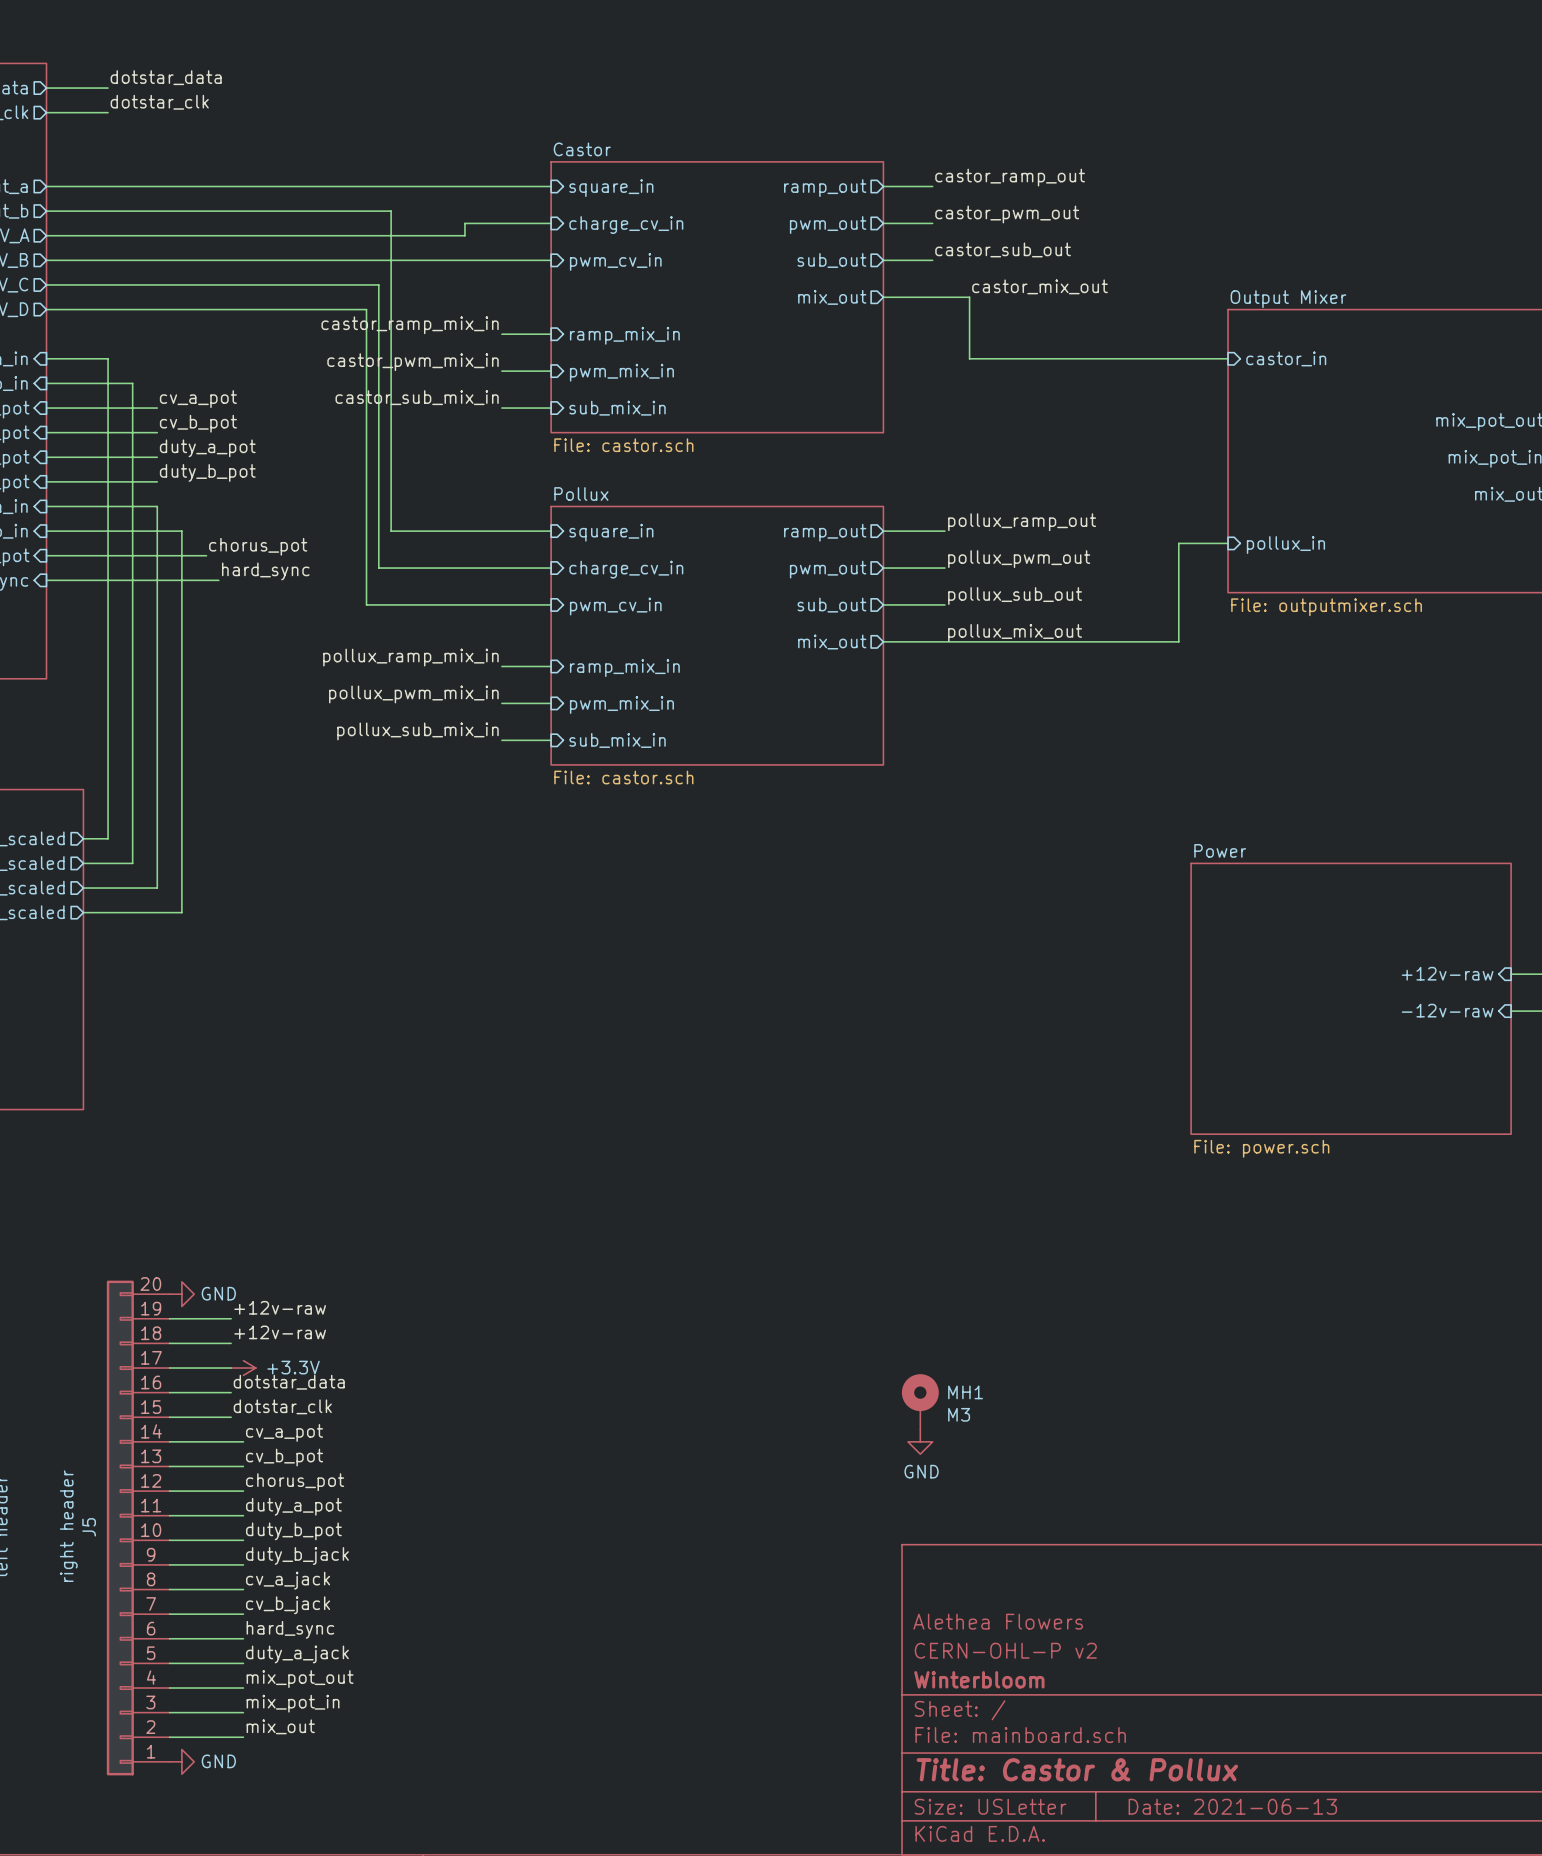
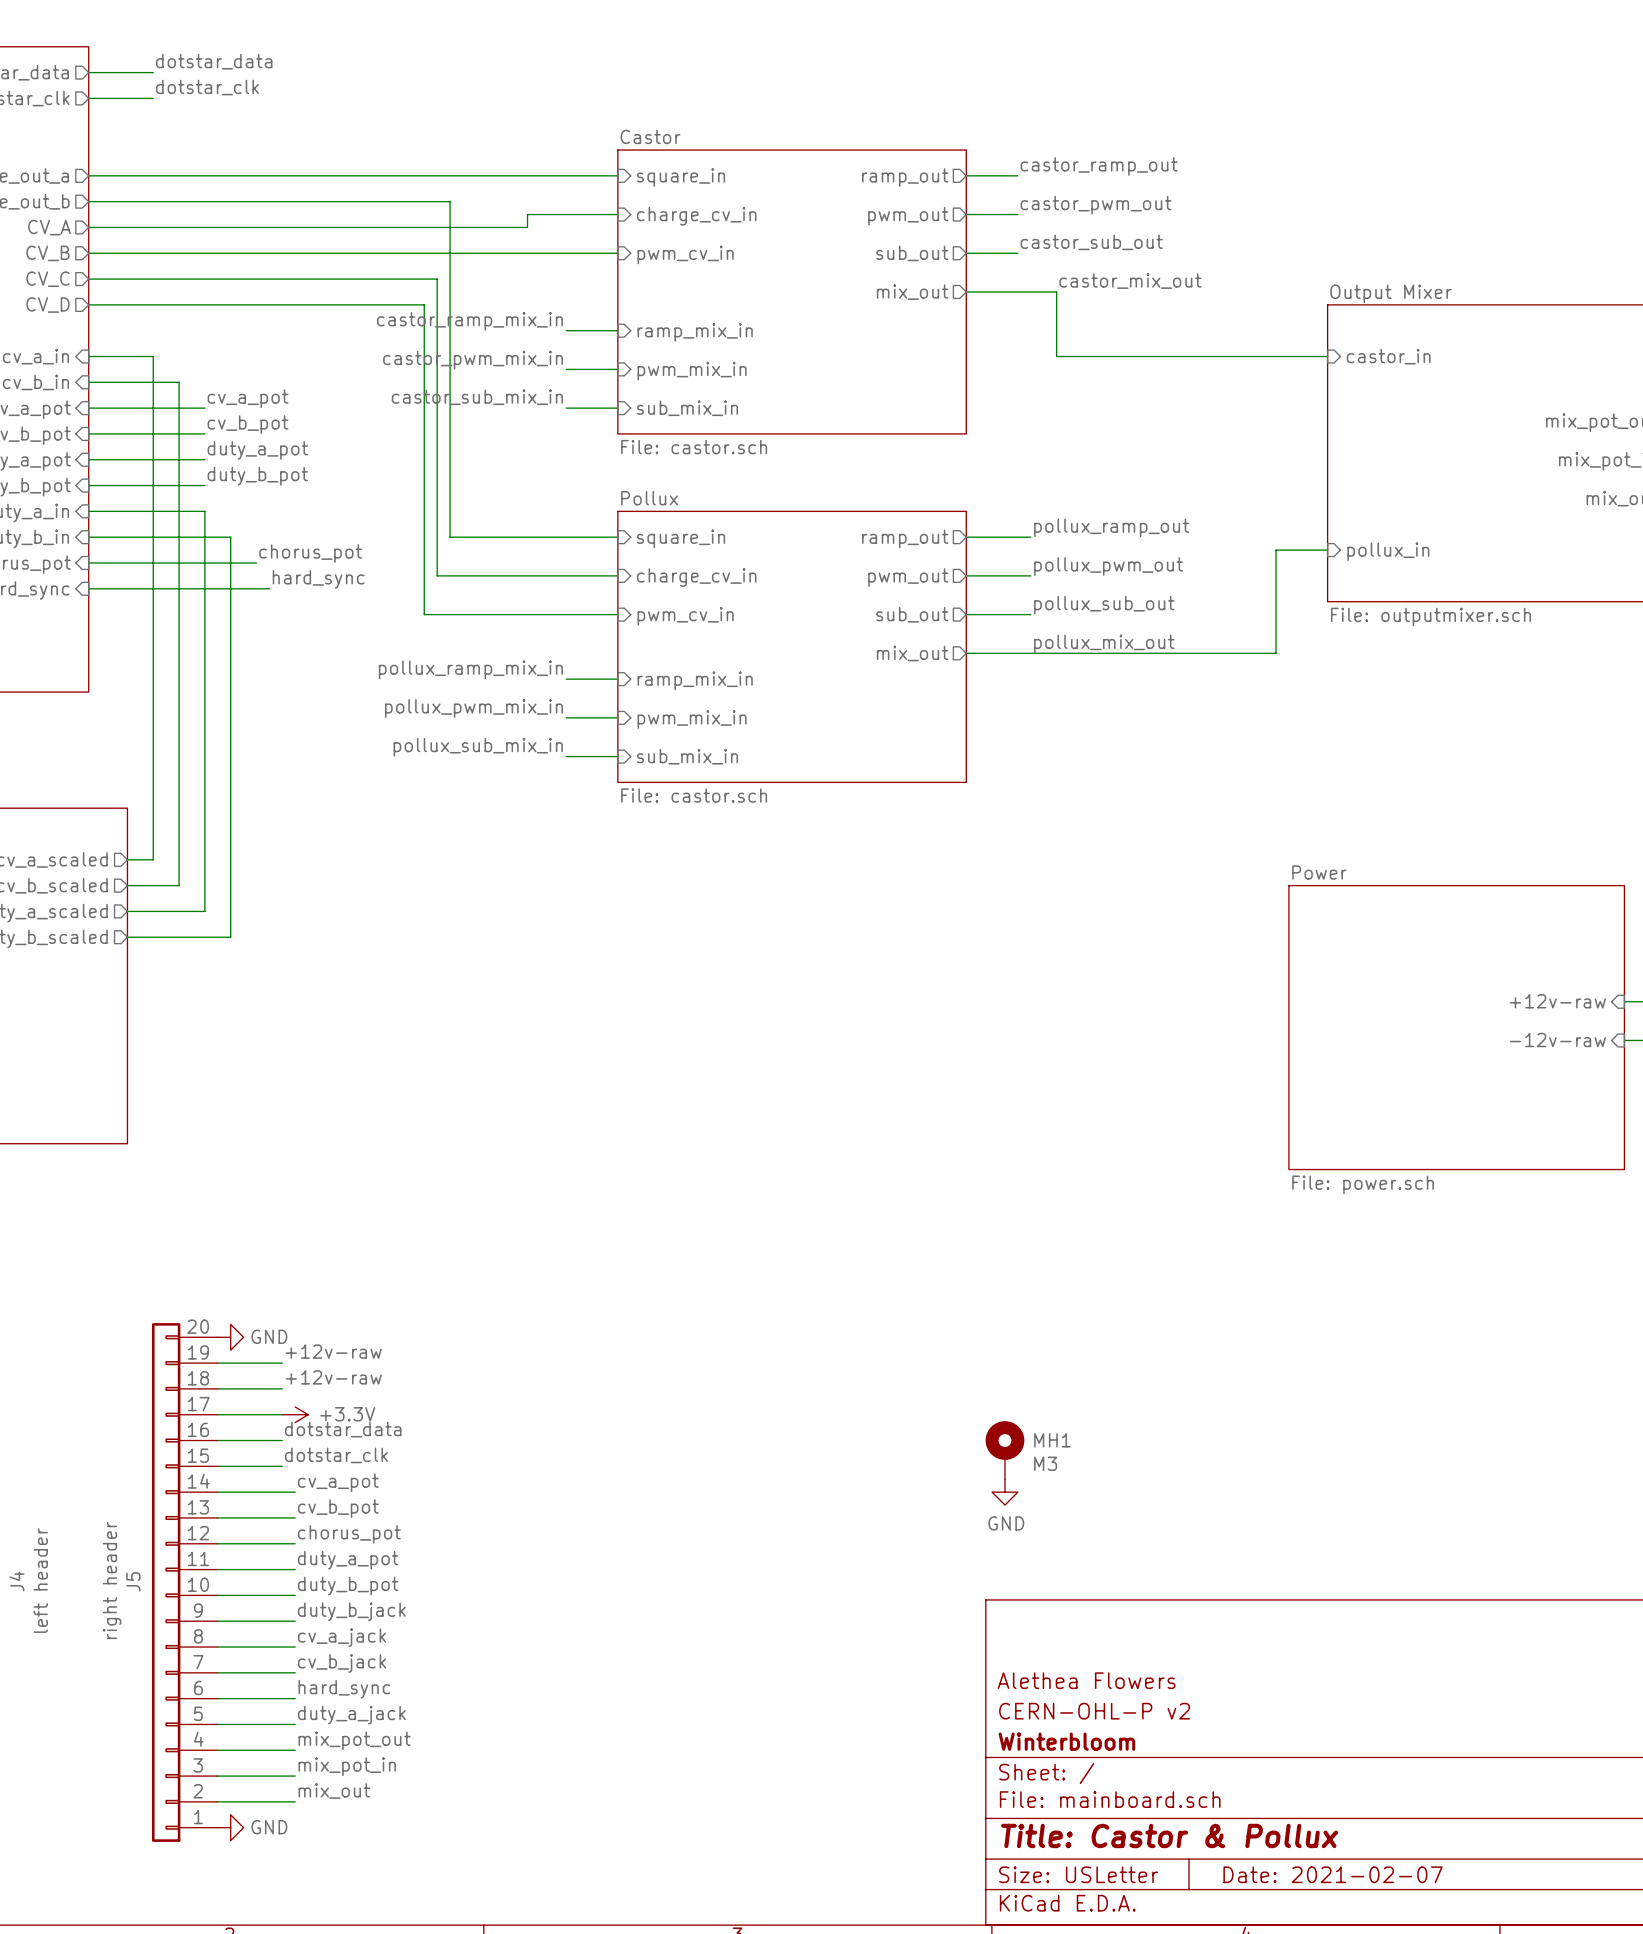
title block: Date: 2021-06-13 (1232, 1806) -> Date: 2021-02-07 (1333, 1874)

